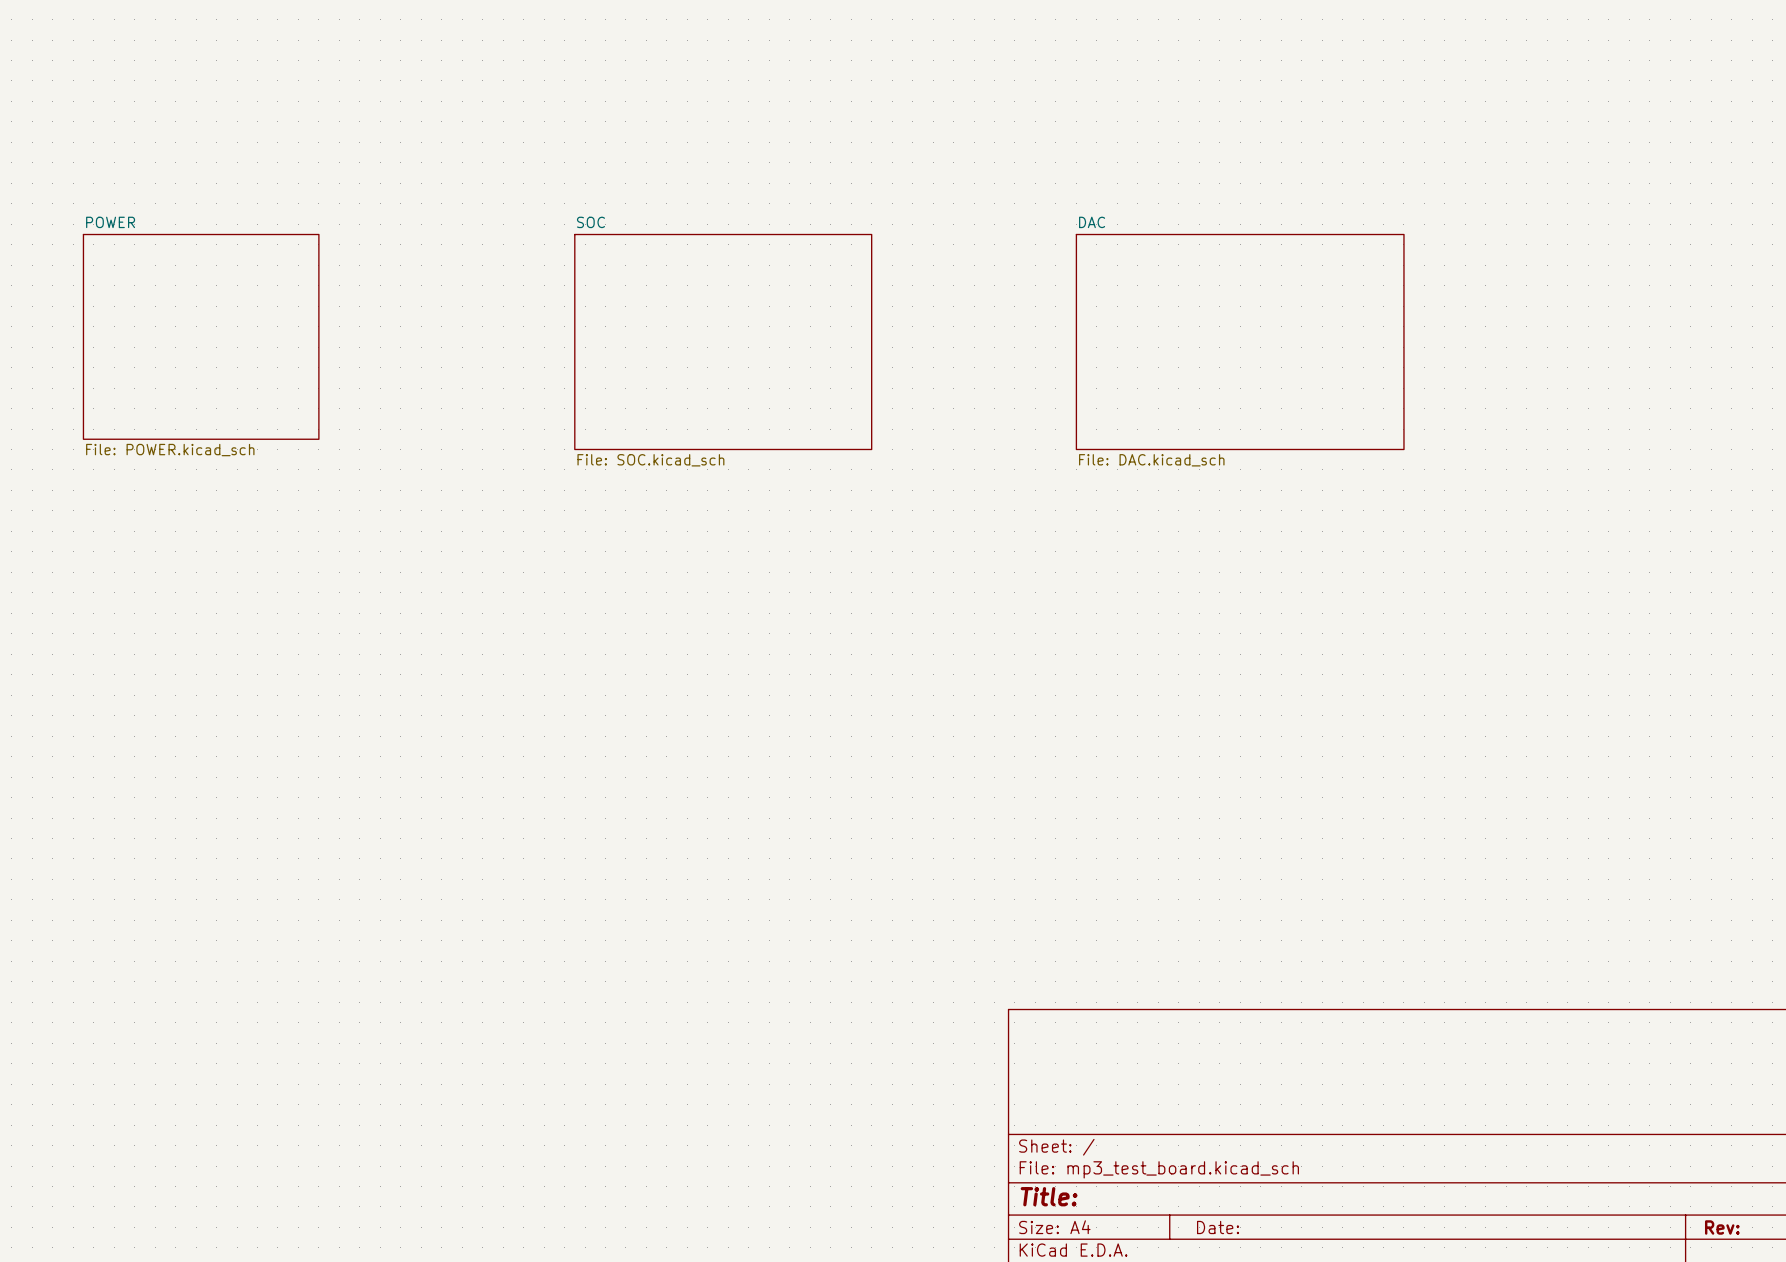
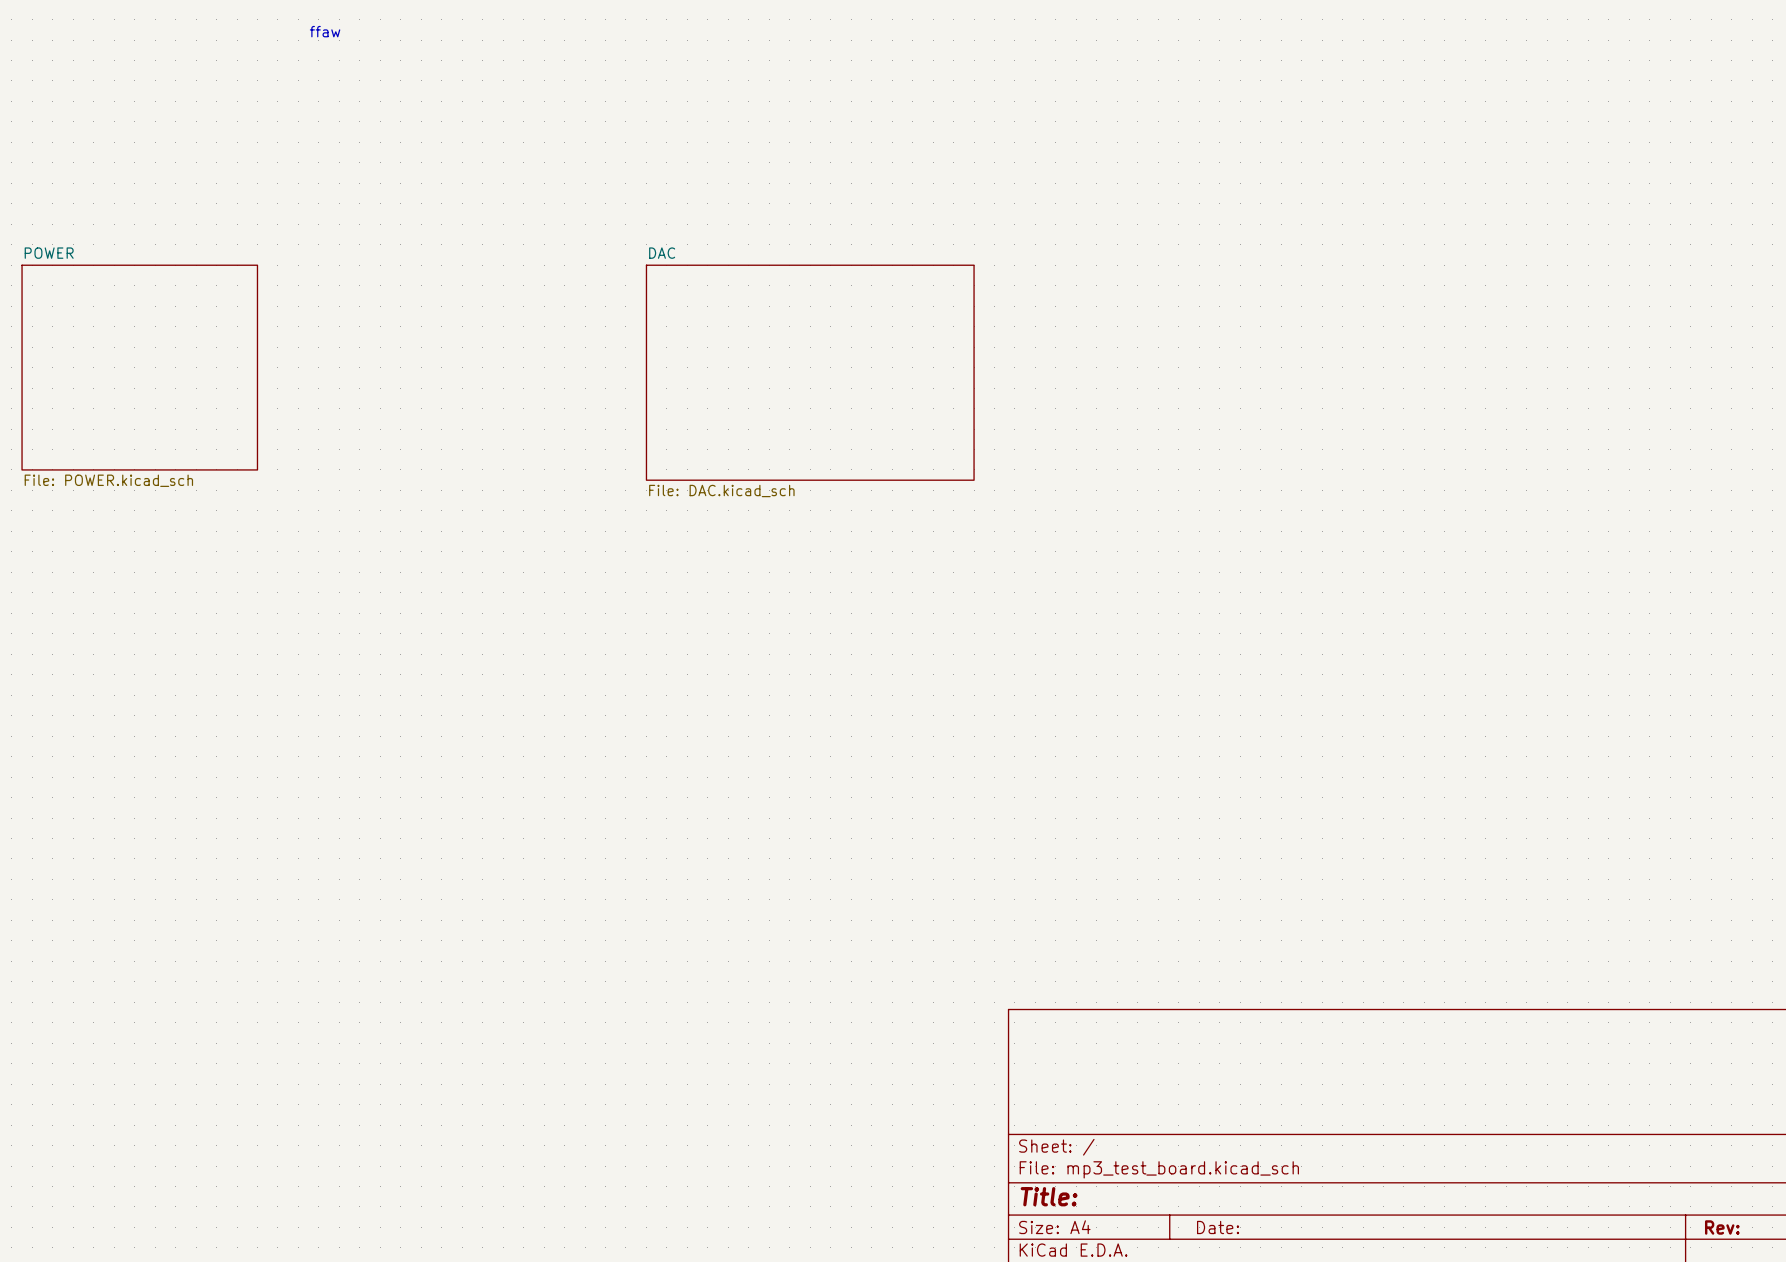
text: none -> ffaw (325, 31)
sheet POWER position: (201, 336) -> (139, 367)
sheet SOC: File: SOC.kicad_sch (723, 341) -> none
sheet DAC: File: DAC.kicad_sch (1240, 341) -> none
sheet DAC: none -> File: DAC.kicad_sch (810, 372)

